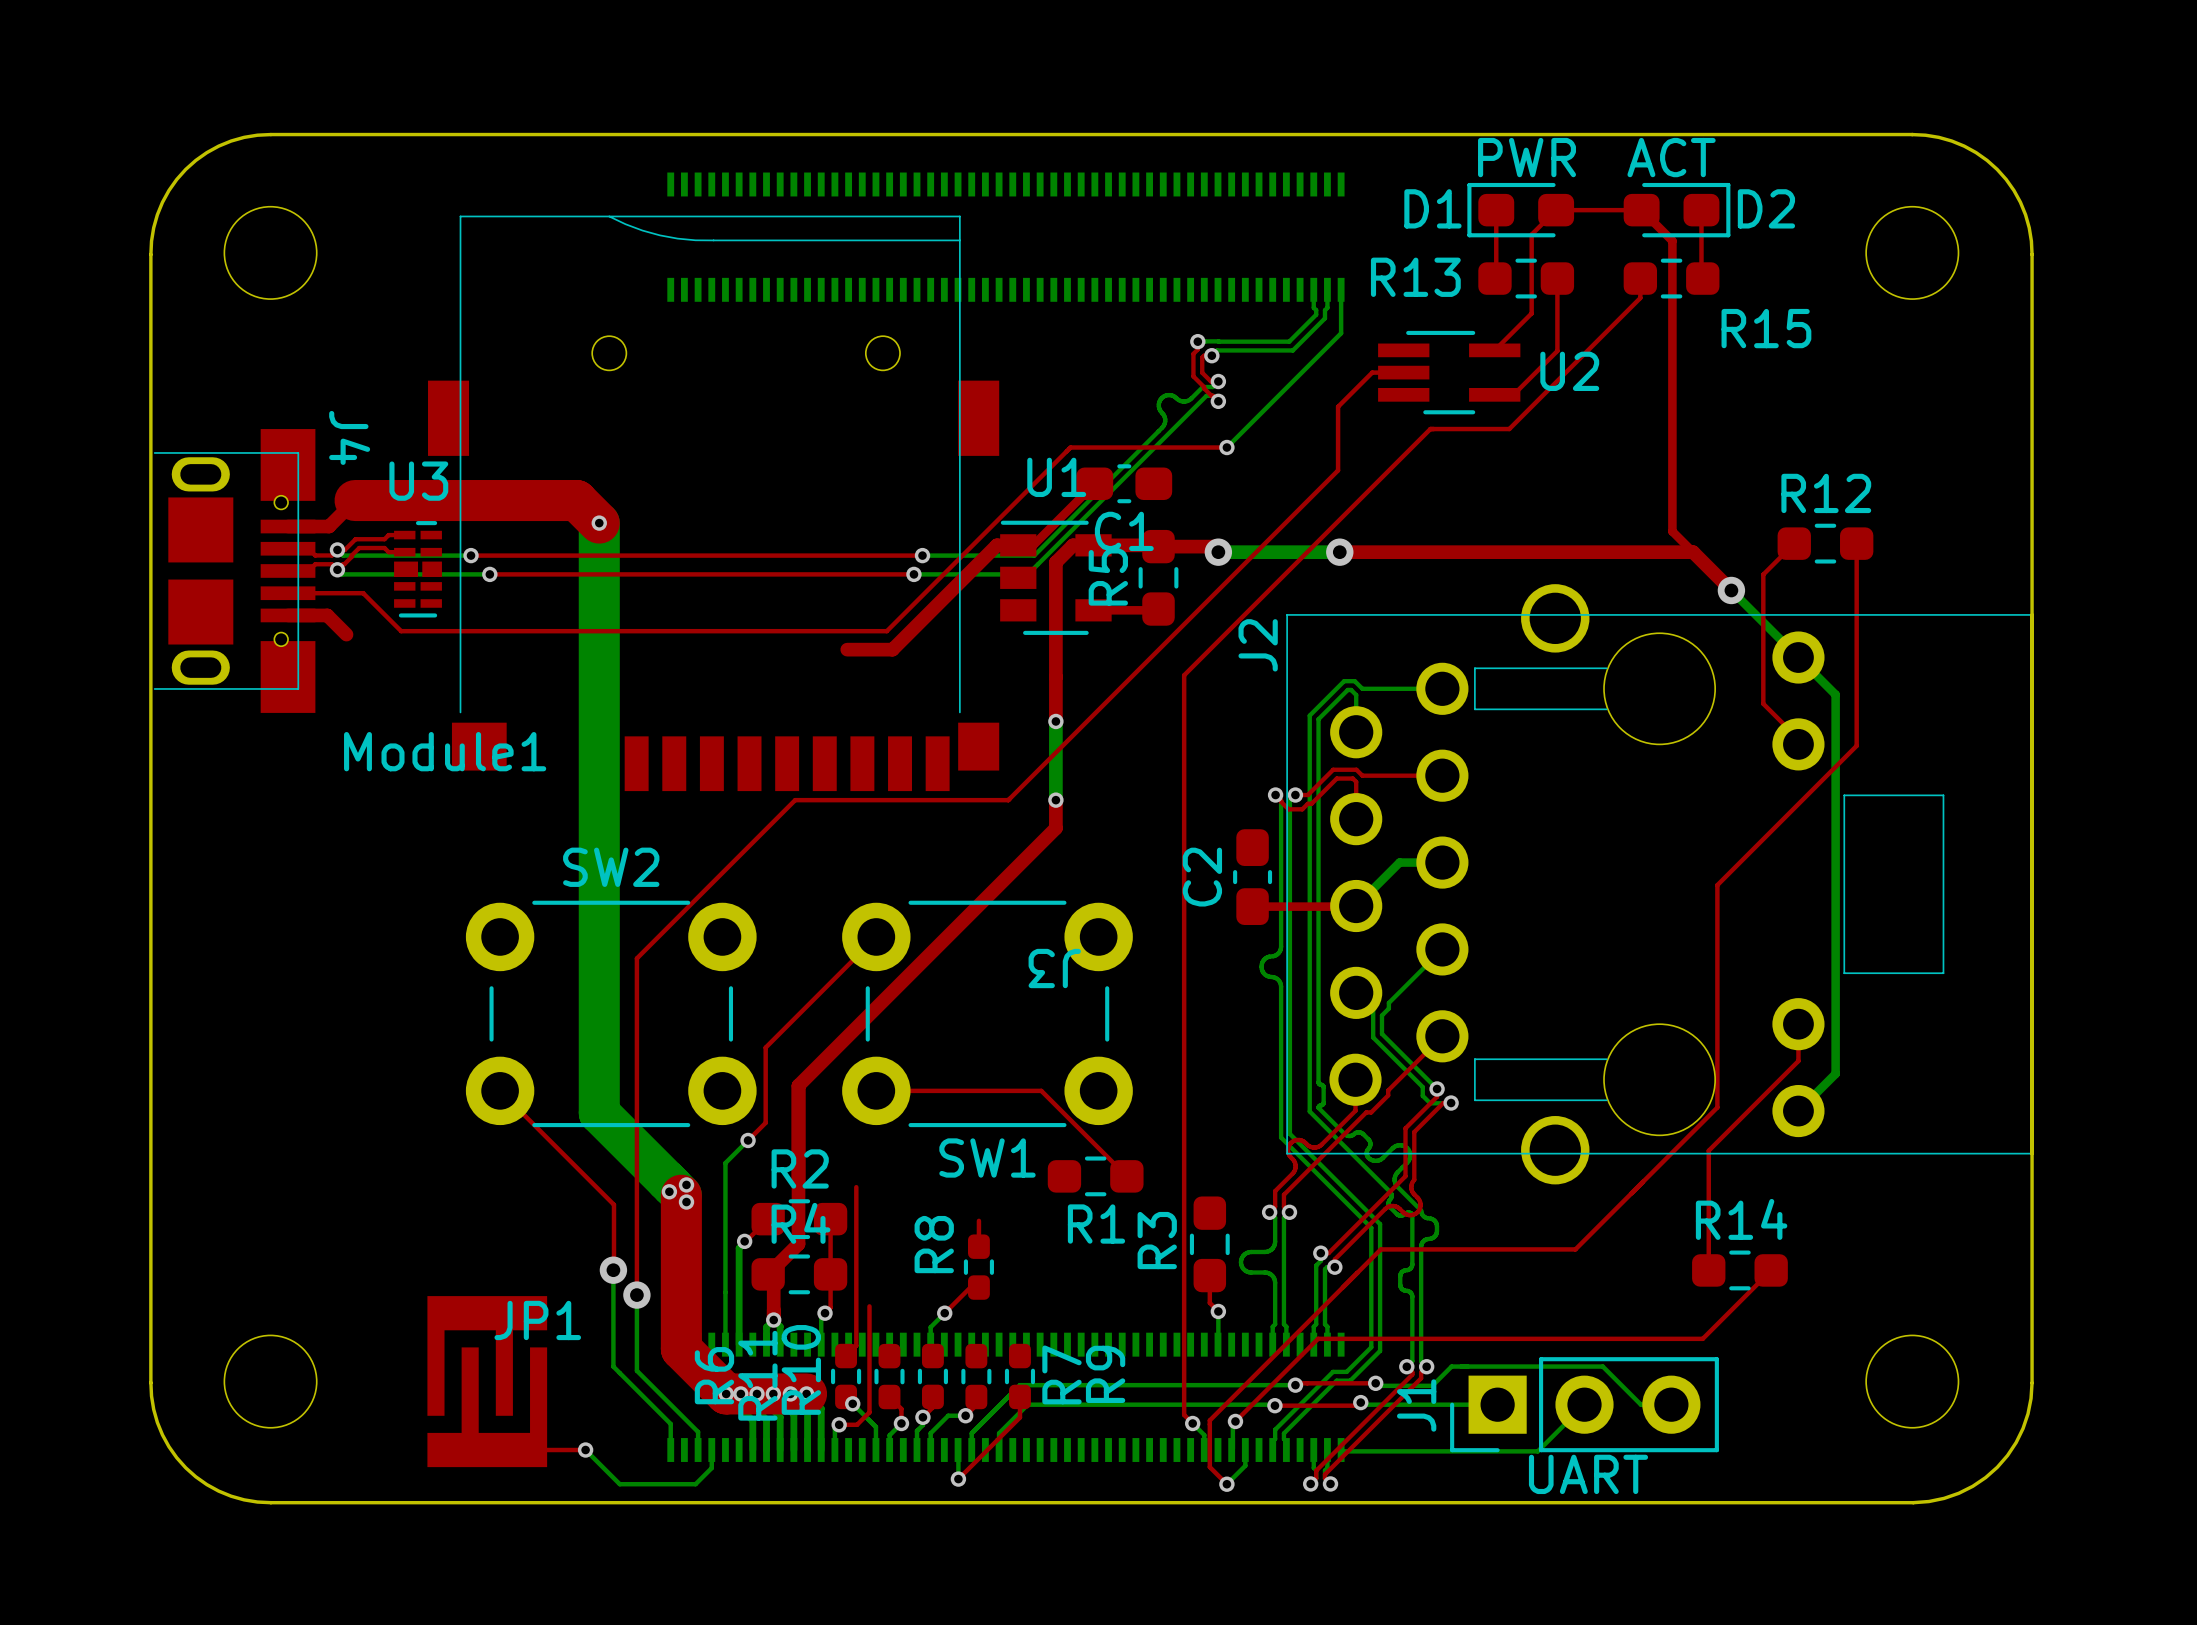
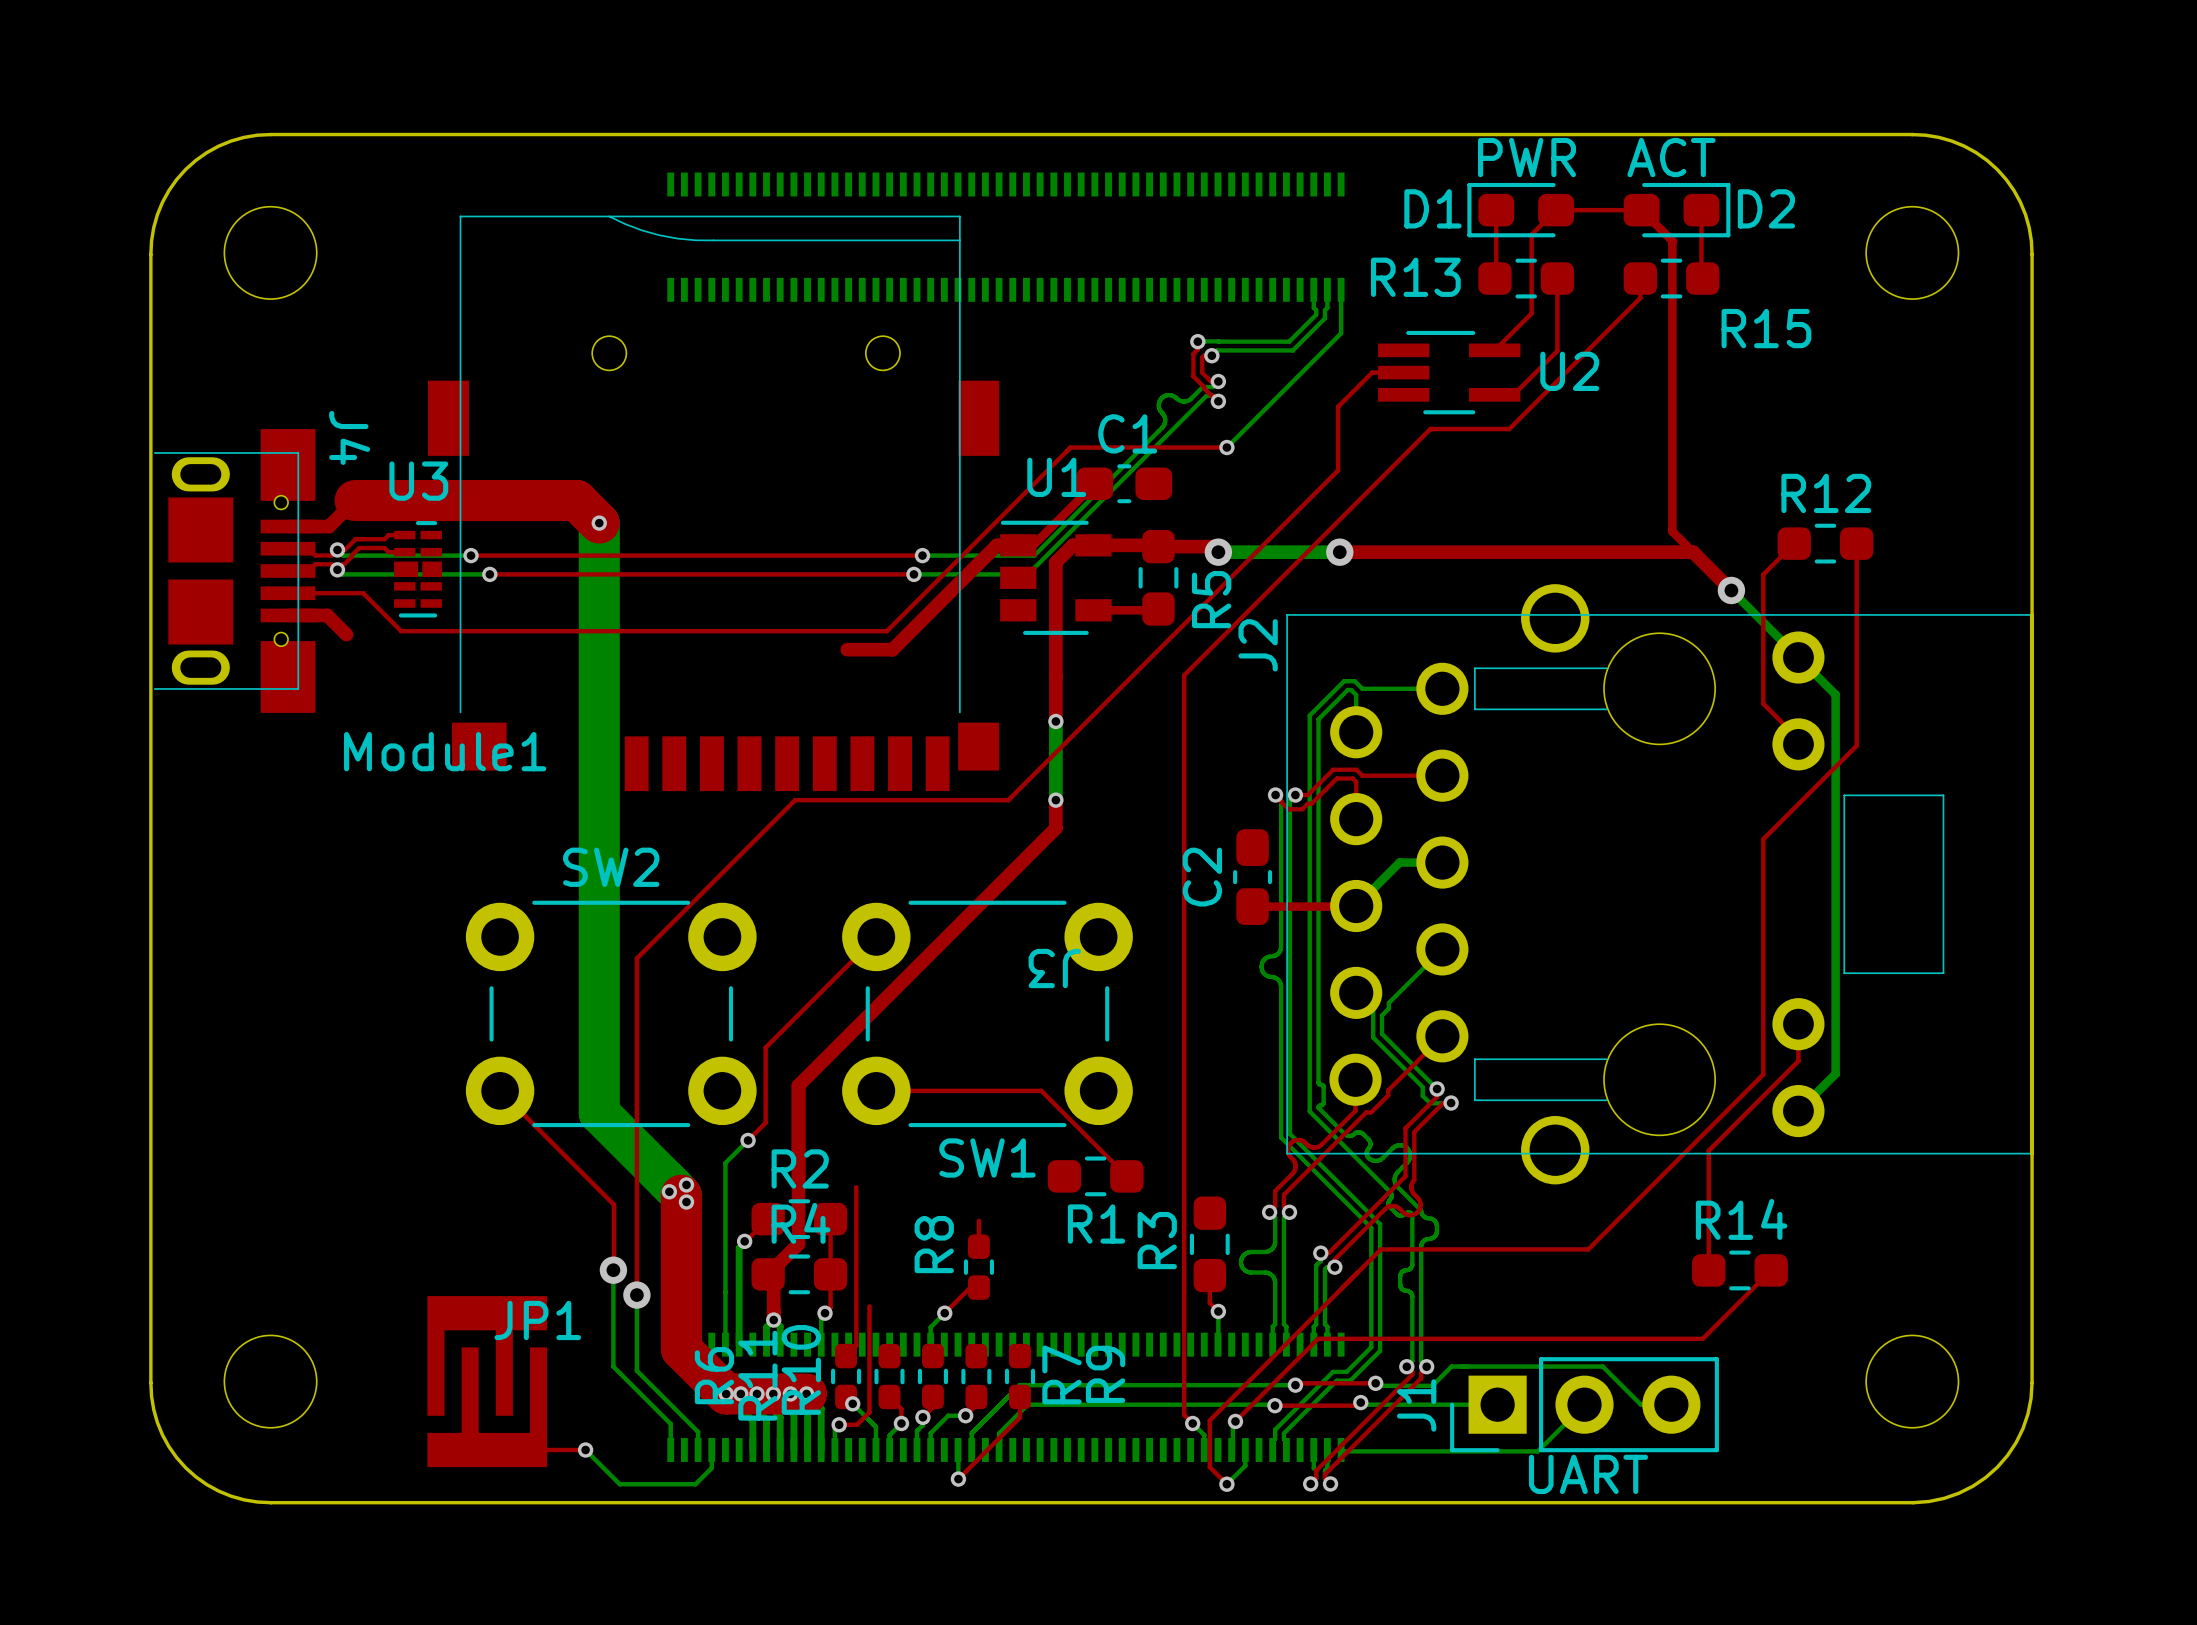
C1 name position: C1 (1124, 531) -> C1 (1127, 433)
R5 name position: R5 (1108, 577) -> R5 (1211, 599)
top track: (1763, 839) (1717, 885) (1717, 1107) (1575, 1249) -> (1763, 839) (1763, 1074) (1588, 1249) (1575, 1249)

